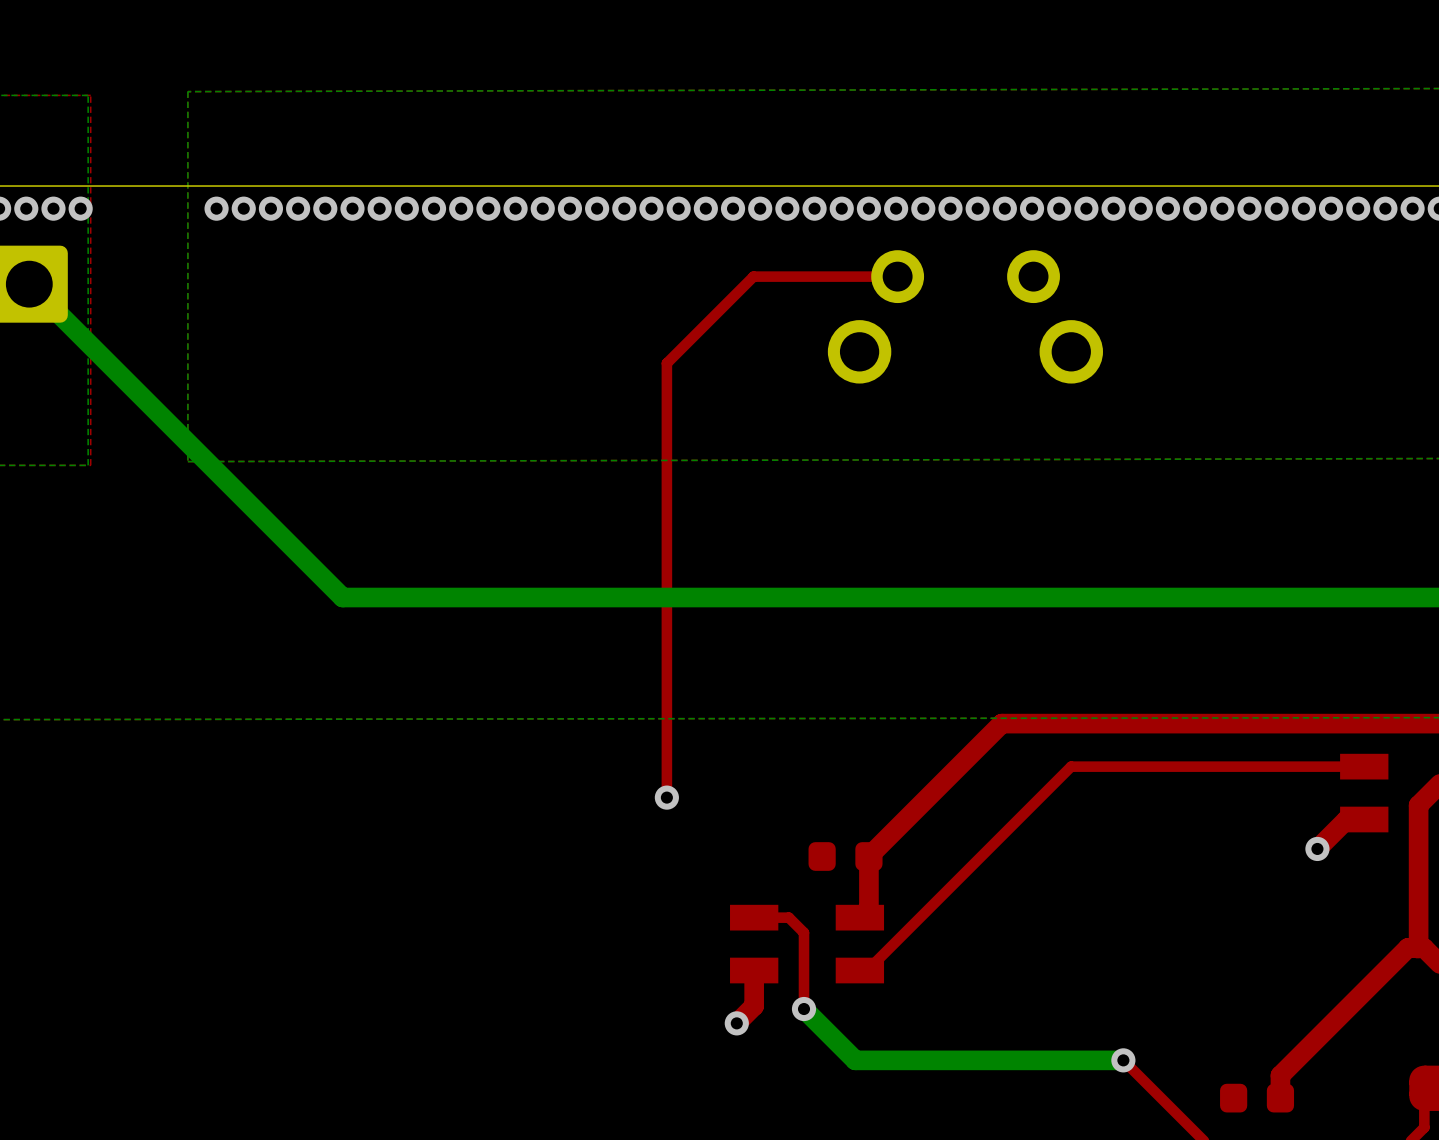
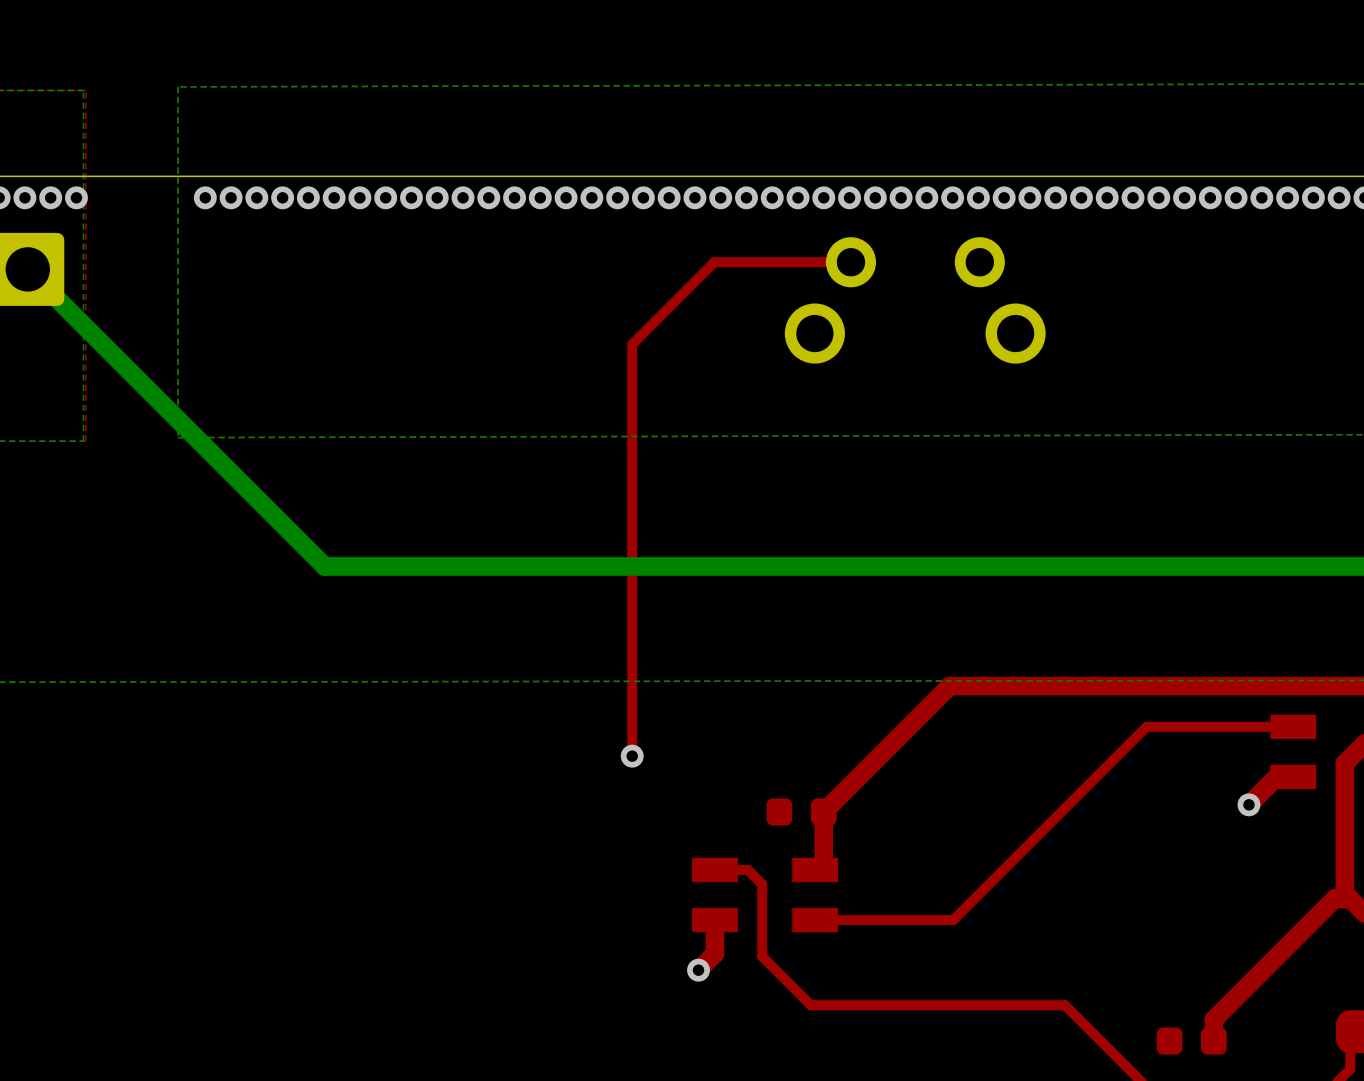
top track: (1209, 766) (1071, 766) (867, 970) -> (1146, 726) (953, 920) (822, 920)
top track: none -> (762, 956) (810, 1005) (1065, 1005)
bottom track: (804, 1009) (855, 1060) (1123, 1060) -> none
via: (804, 1009) -> none
via: (1123, 1060) -> none

